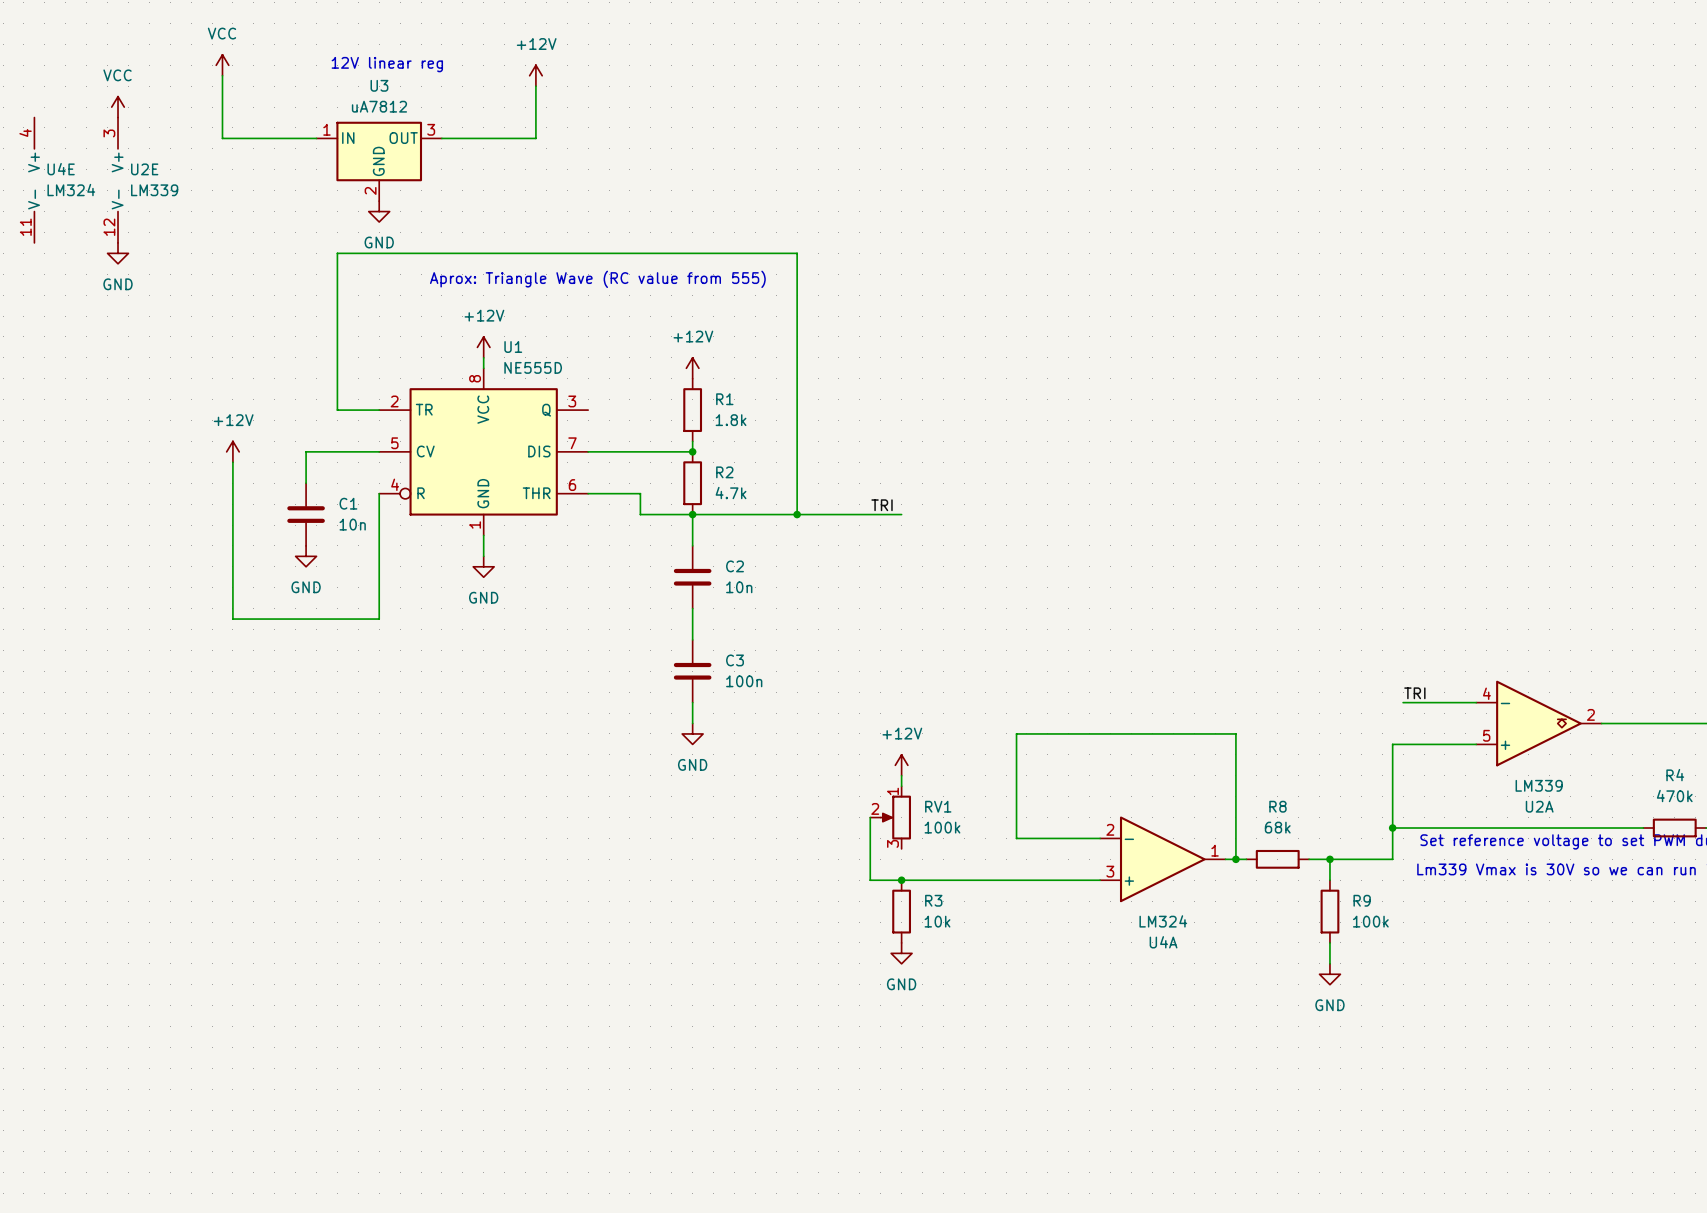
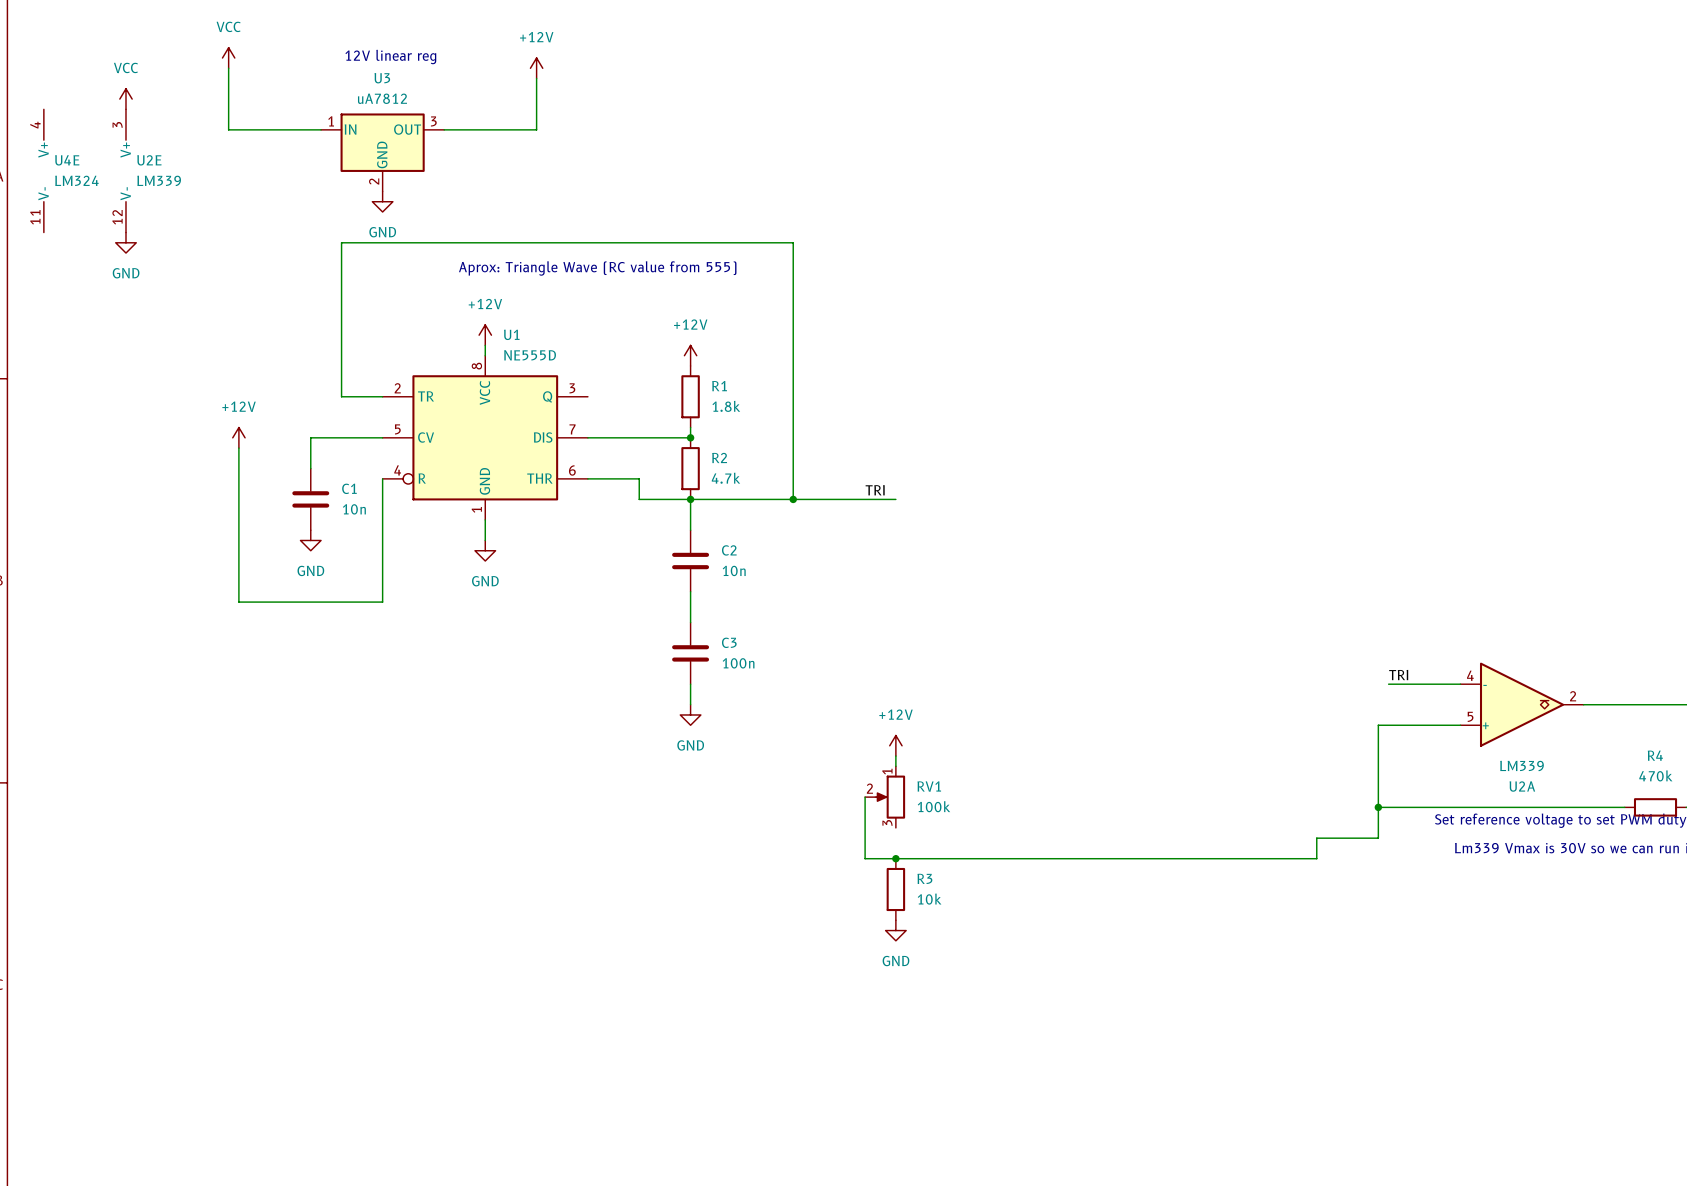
wire: (1100, 838) (1016, 838) (1016, 733) (1235, 733) (1235, 859) -> none
U4A: LM324 (1162, 859) -> none
wire: (1225, 859) (1246, 859) -> none
junction: (1235, 859) -> none
R8: 68k (1277, 859) -> none
wire: (1309, 859) (1329, 859) -> none
junction: (1329, 859) -> none
wire: none -> (1090, 858) (1316, 858)
R9: 100k (1329, 911) -> none
wire: (1329, 942) (1329, 963) -> none
power symbol: GND (1329, 974) -> none

